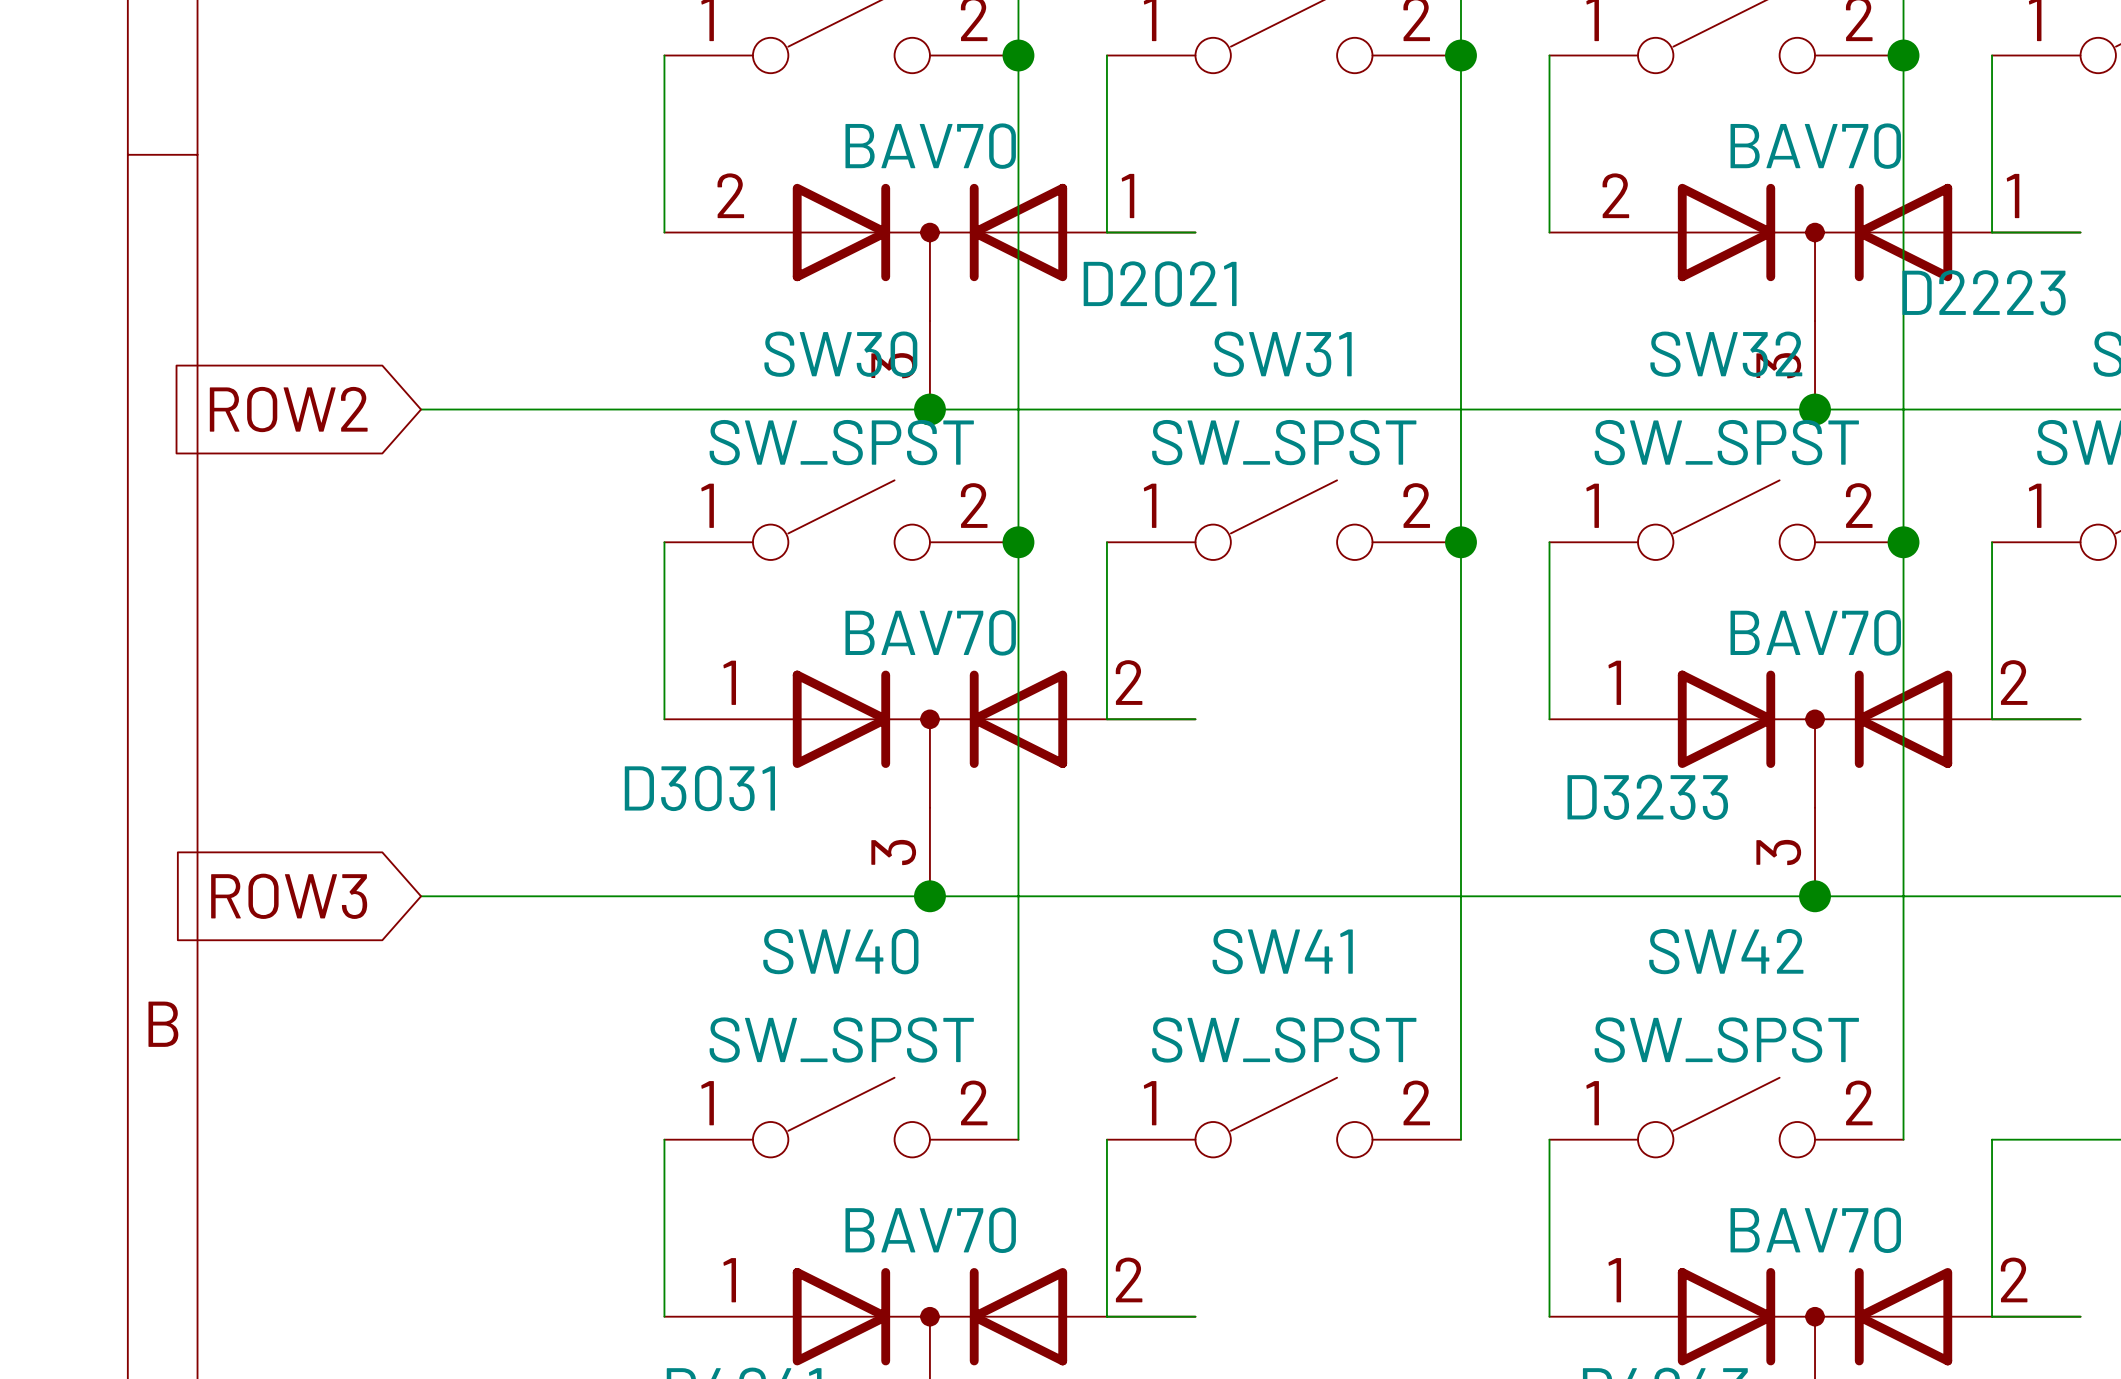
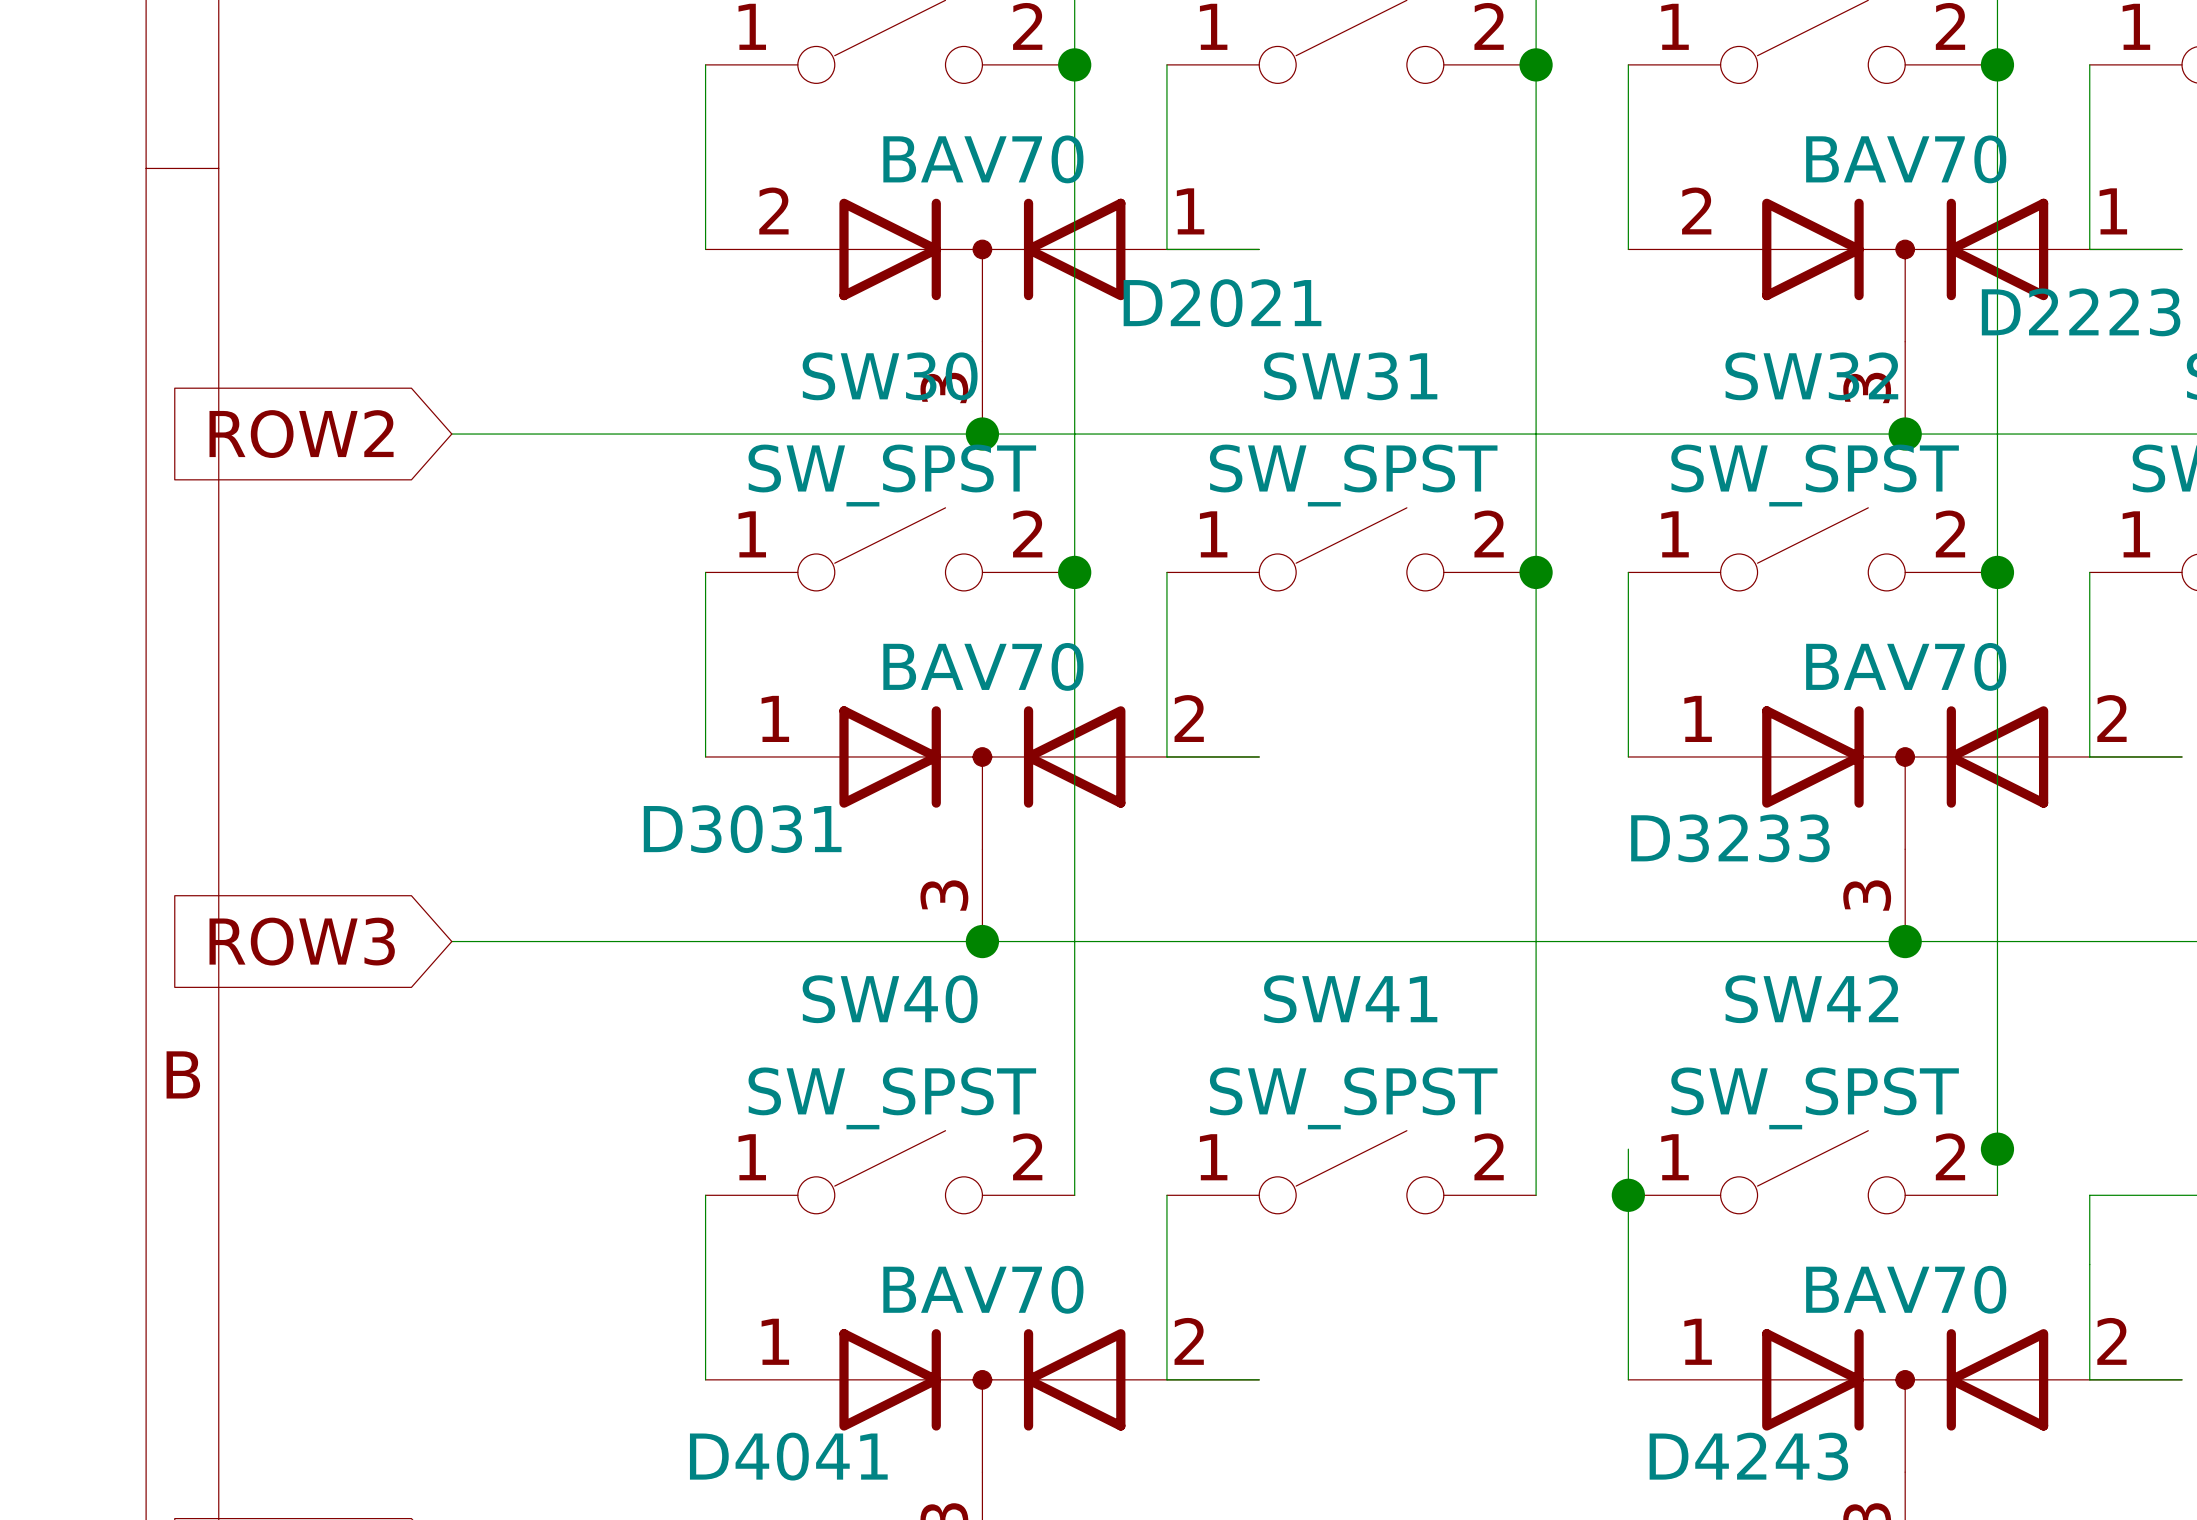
wire: none -> (1628, 1149) (1628, 1195)
junction: none -> (1997, 1149)
junction: none -> (1628, 1195)

